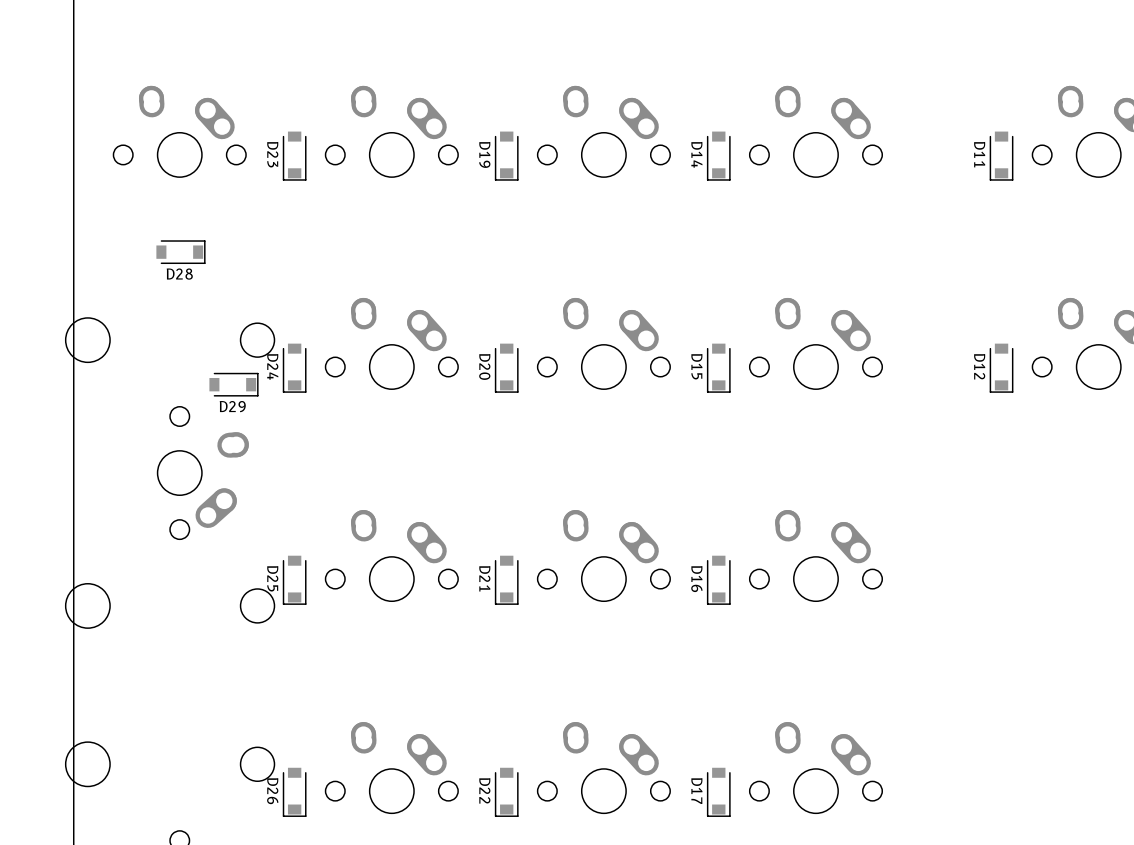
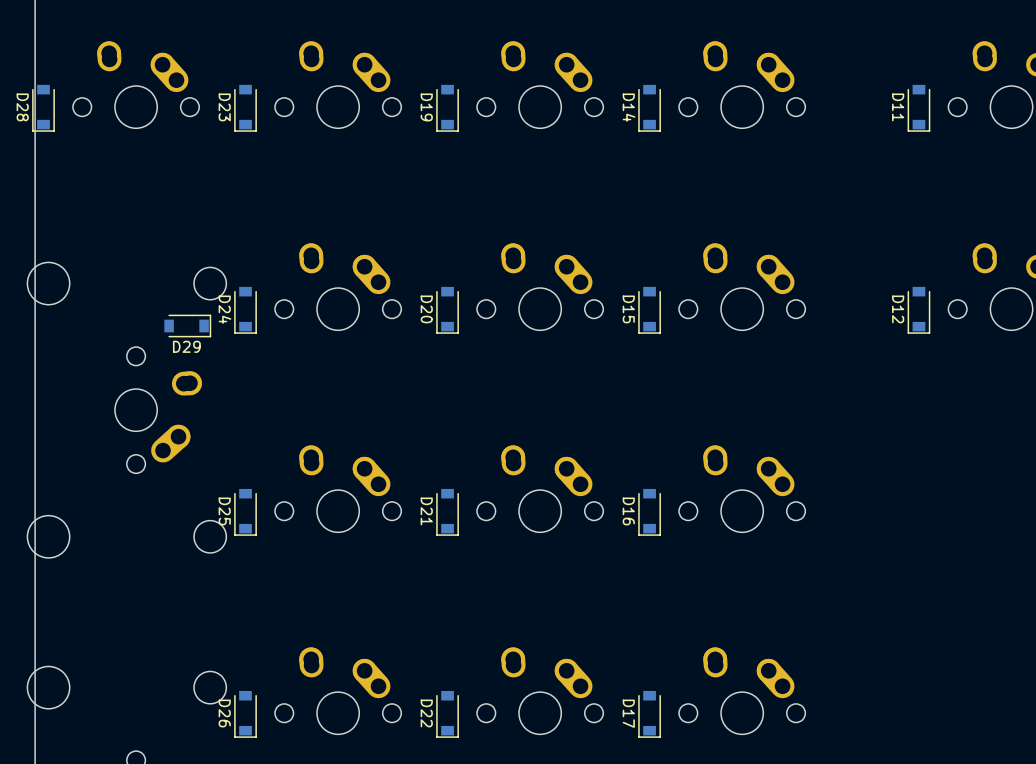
D28 rotation: 0° (180, 252) -> 90° clockwise (43, 108)
D28 position: (180, 252) -> (43, 108)

